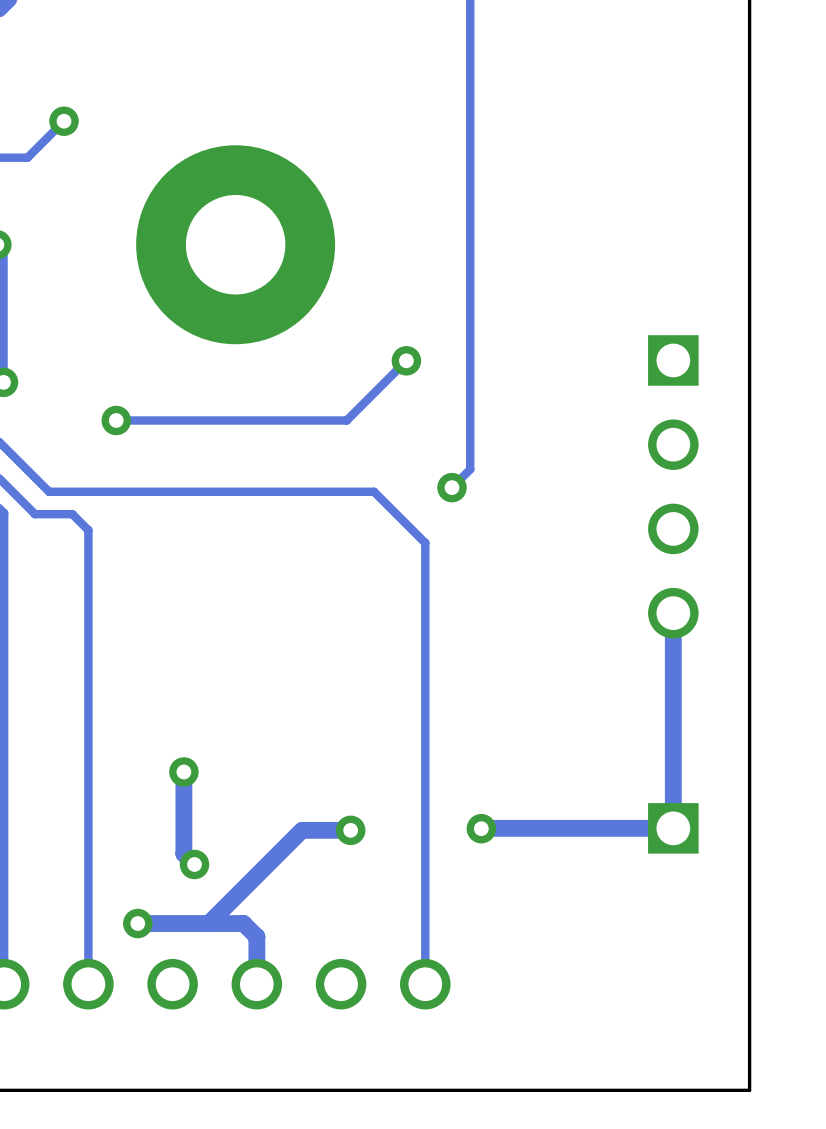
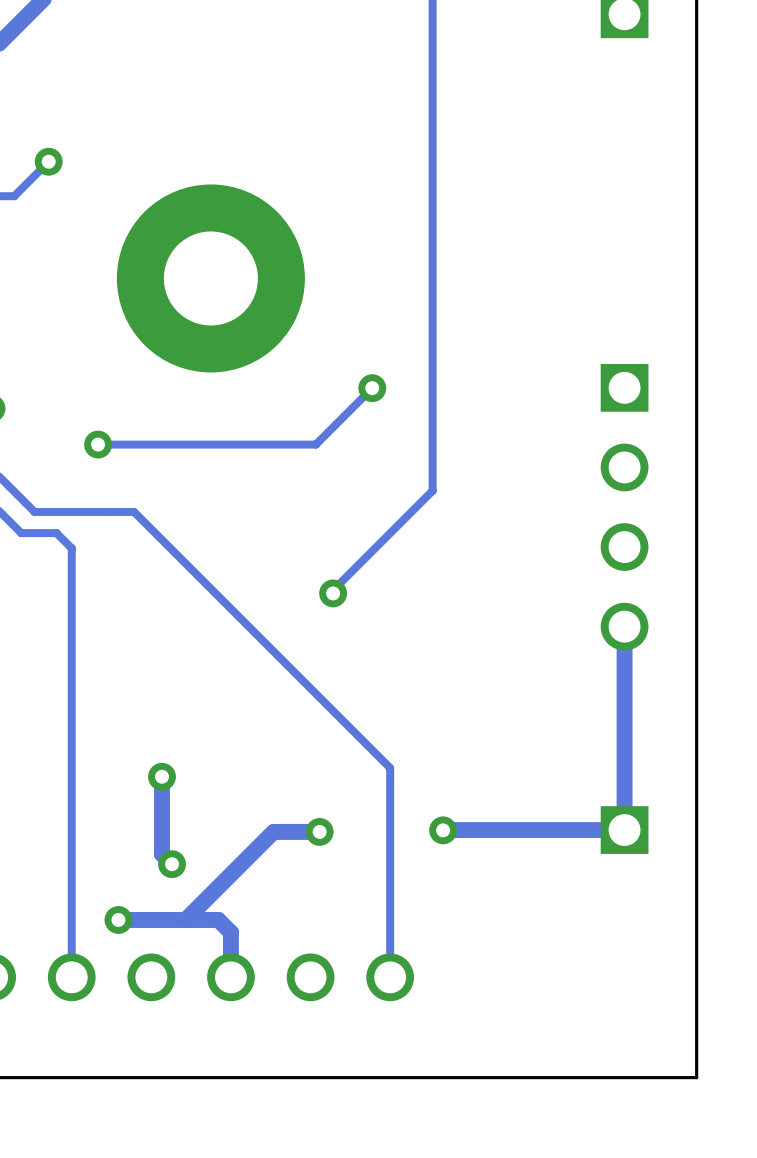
track: none -> (415, 508) (333, 590) (333, 593)
via position: (451, 487) -> (333, 593)
track: (154, 491) (374, 491) (425, 543) (425, 762) -> (134, 511) (390, 767)

